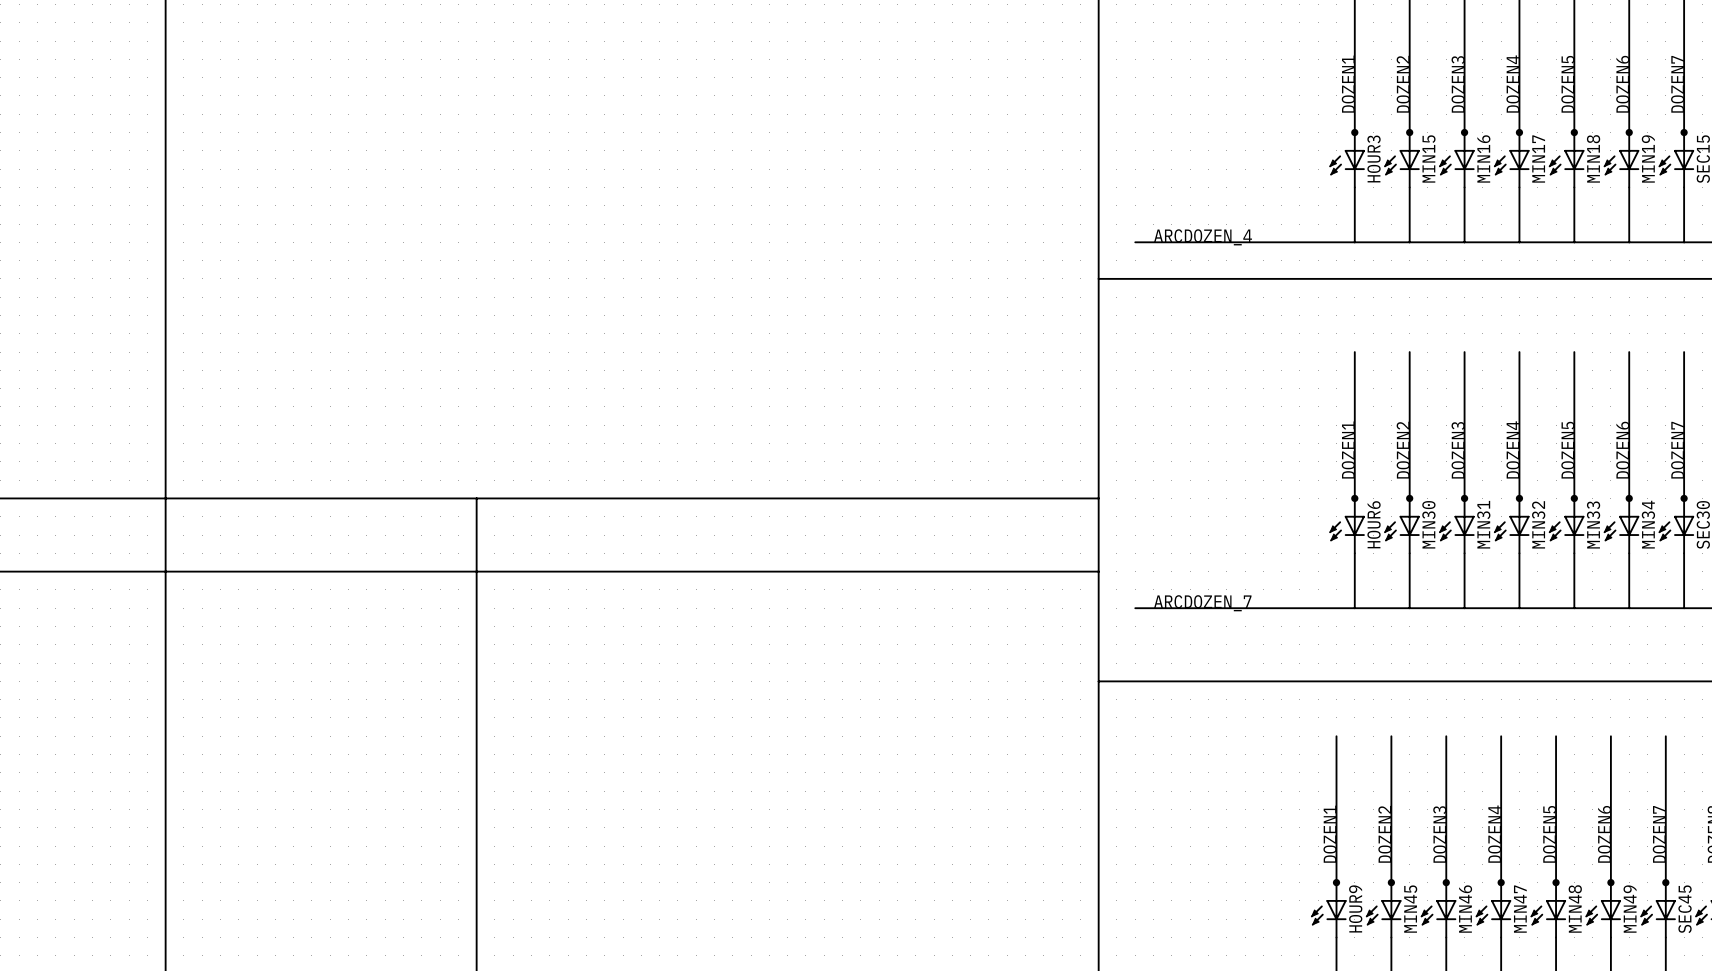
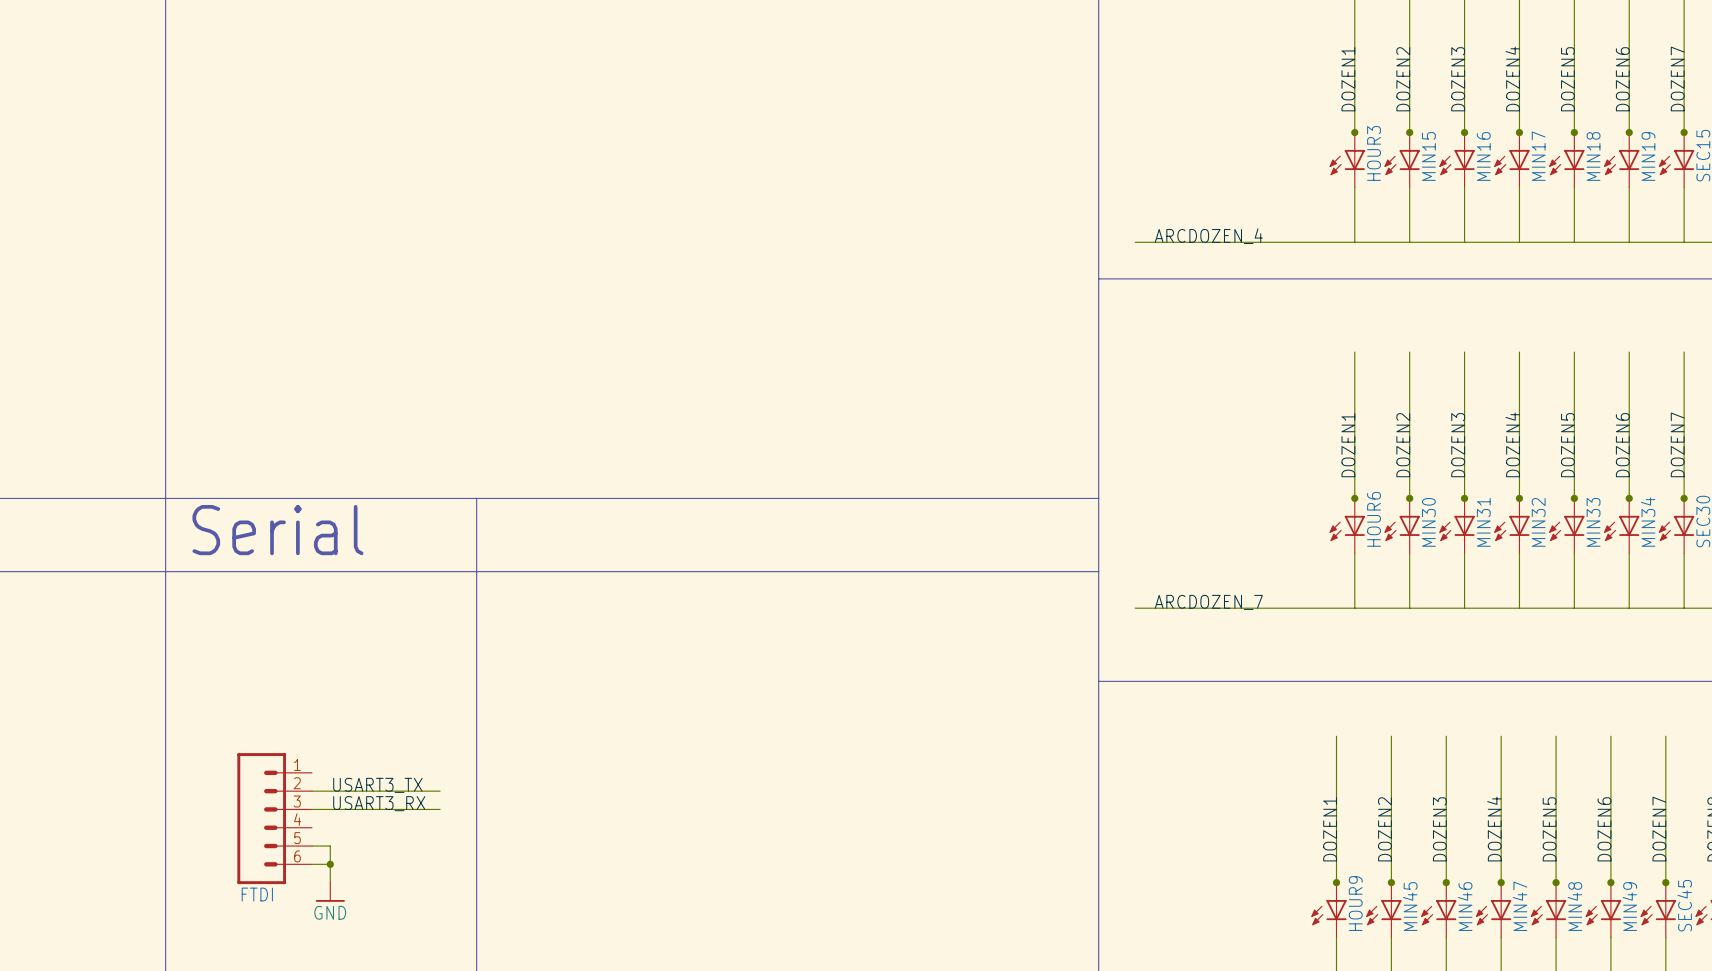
text: none -> Serial (277, 530)
label: none -> USART3_TX (377, 785)
wire: none -> (311, 791) (440, 791)
label: none -> USART3_RX (379, 803)
wire: none -> (311, 809) (440, 809)
FTDI: none -> (274, 818)
wire: none -> (311, 846) (330, 846) (330, 882)
wire: none -> (311, 864) (330, 864)
junction: none -> (330, 864)
power symbol: none -> GND (330, 892)

